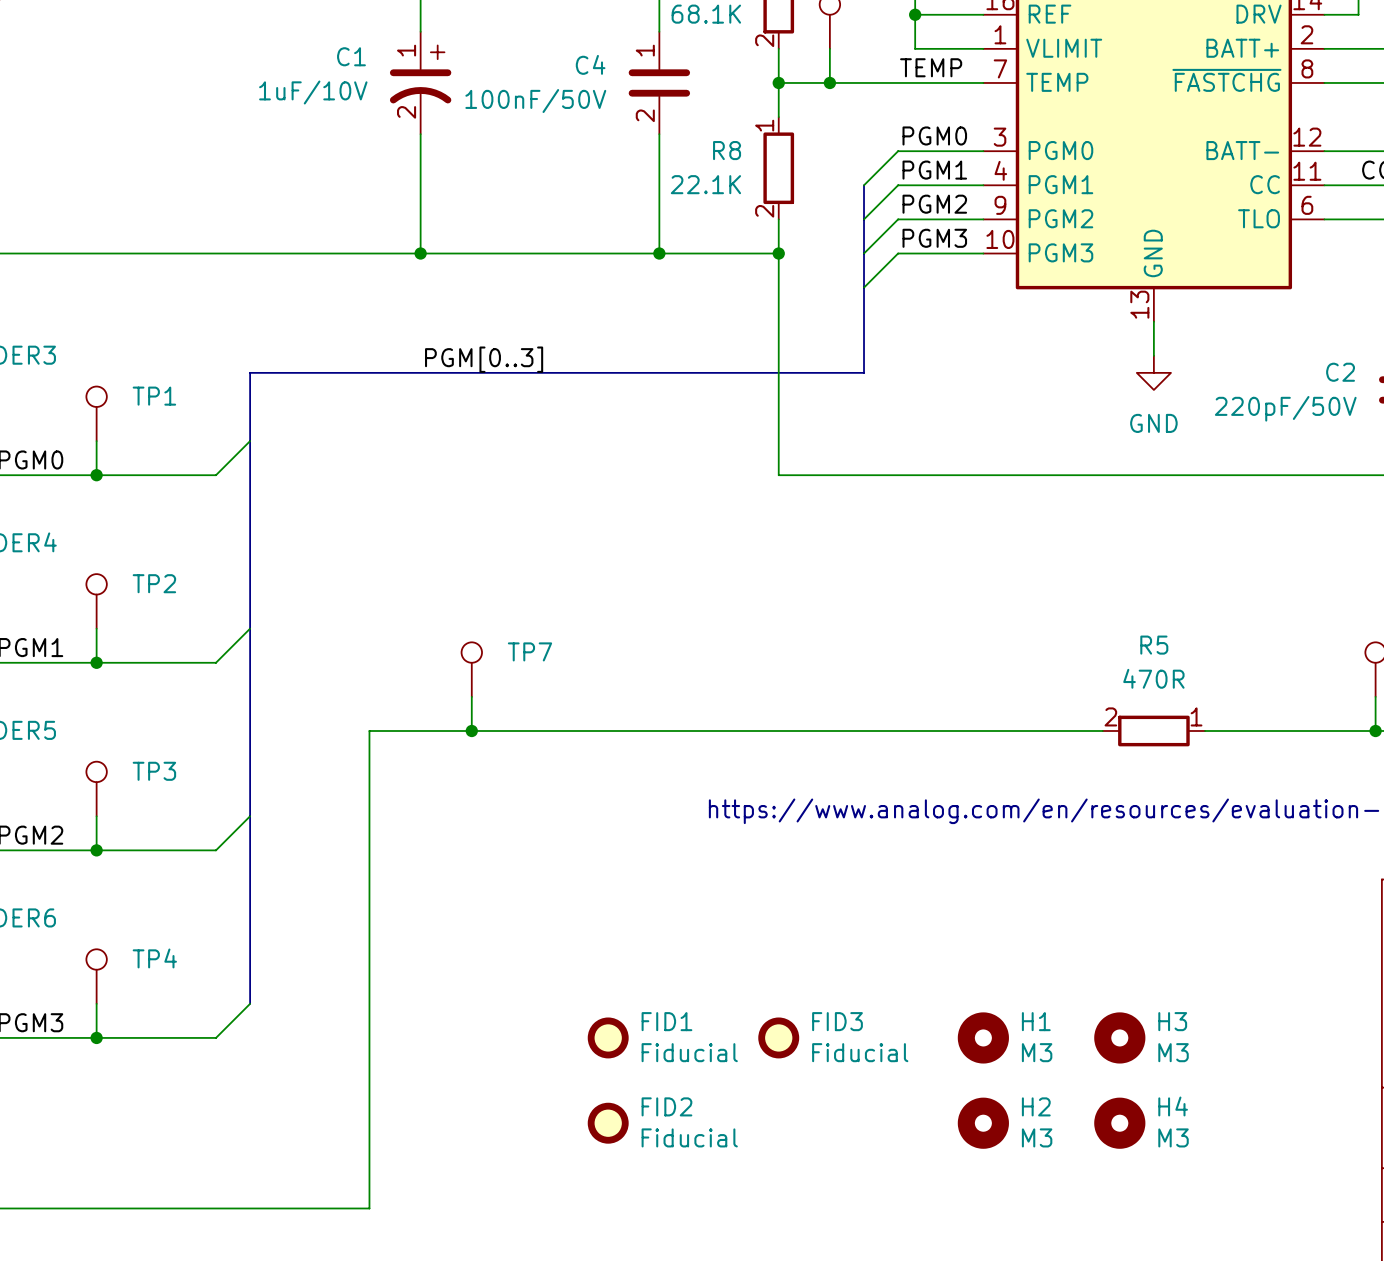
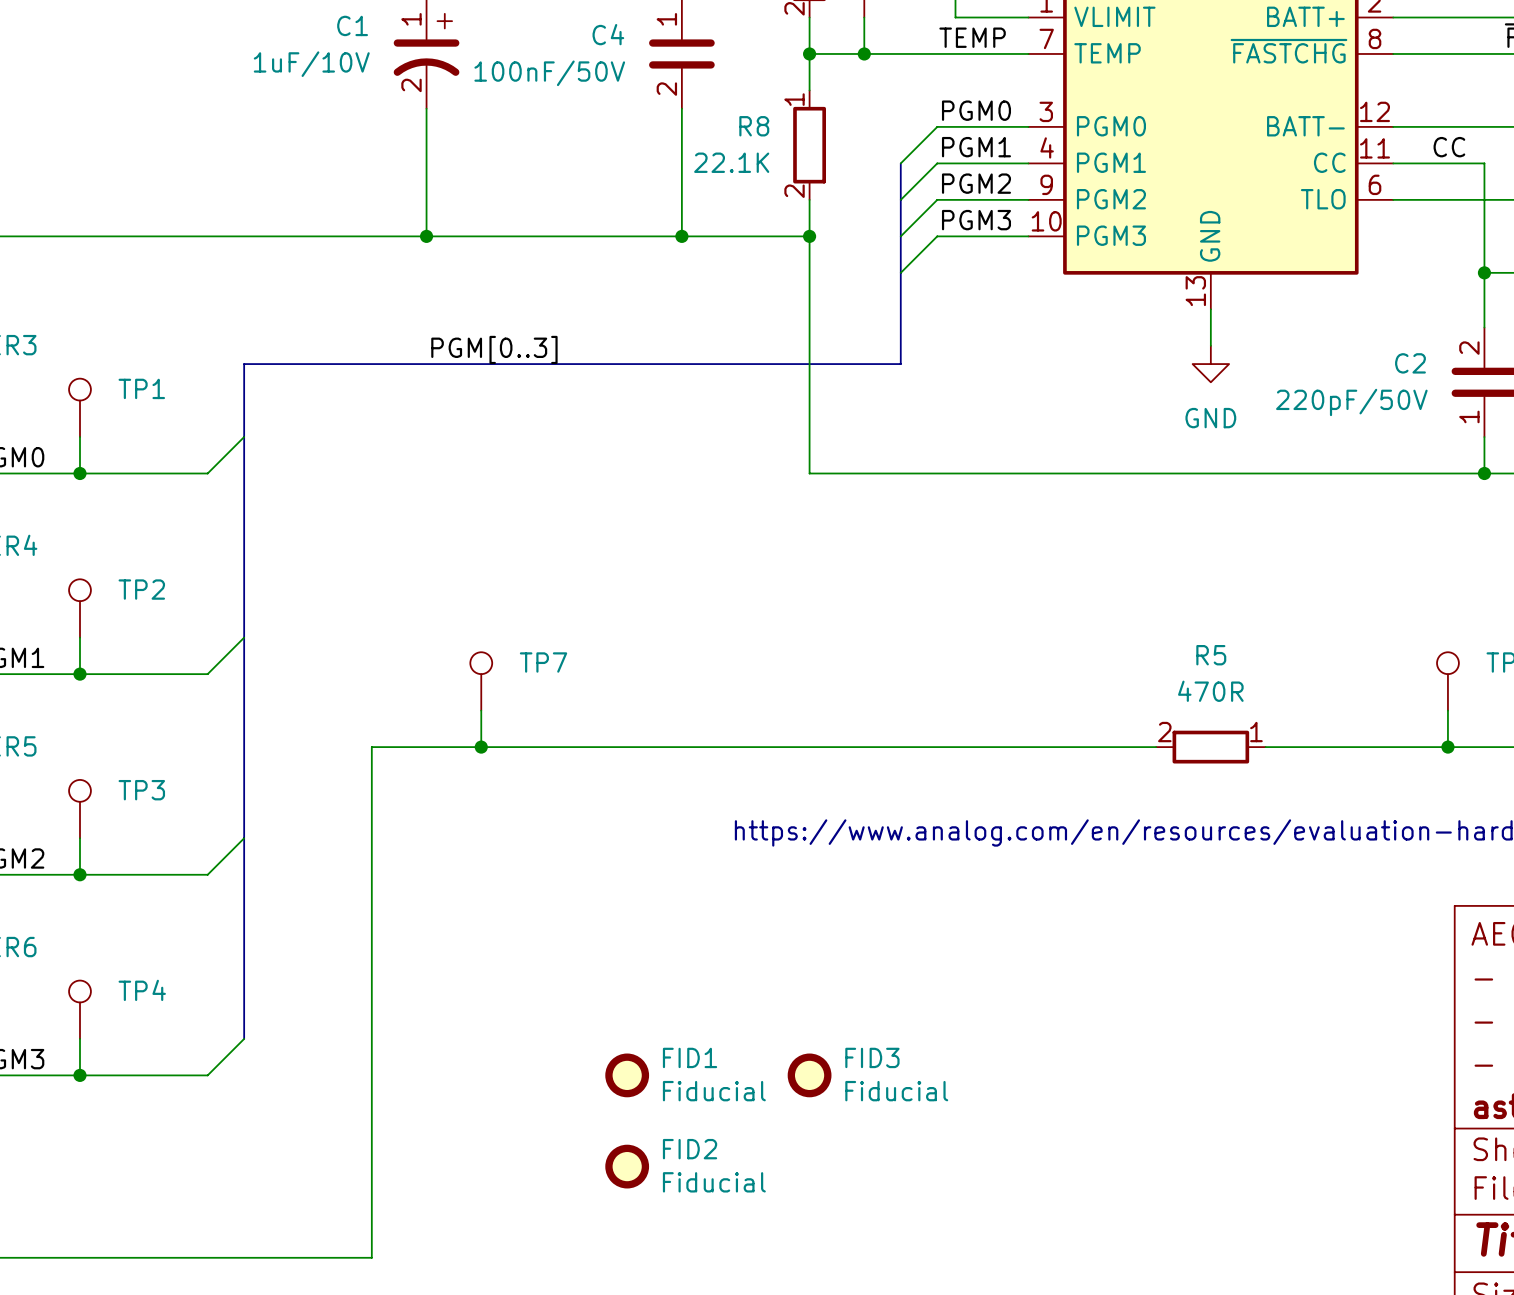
H1: M3 (983, 1037) -> none
H3: M3 (1119, 1037) -> none
H2: M3 (983, 1123) -> none
H4: M3 (1119, 1123) -> none

